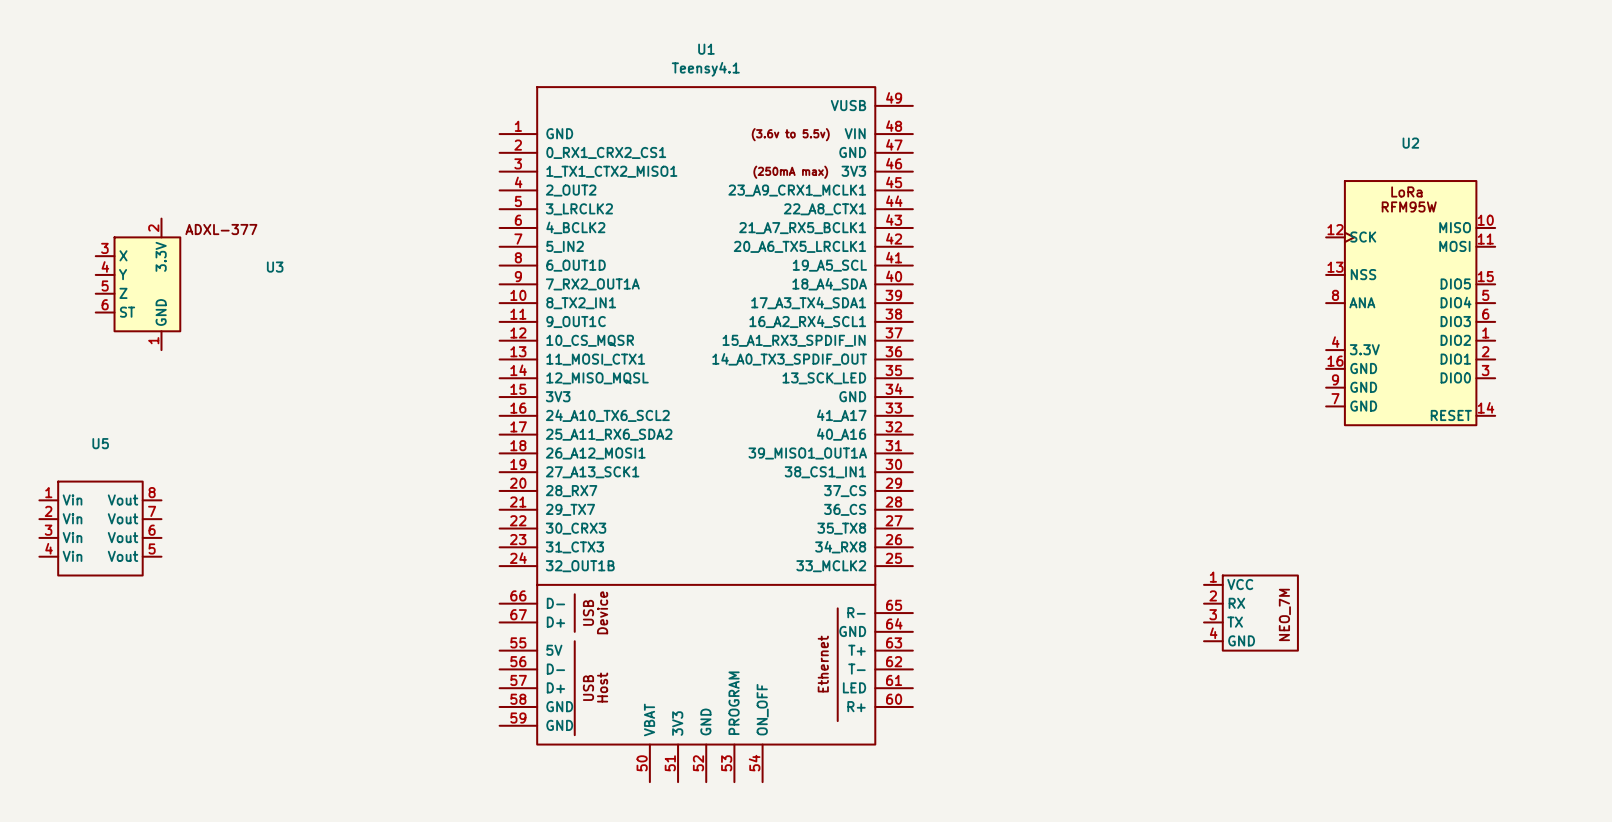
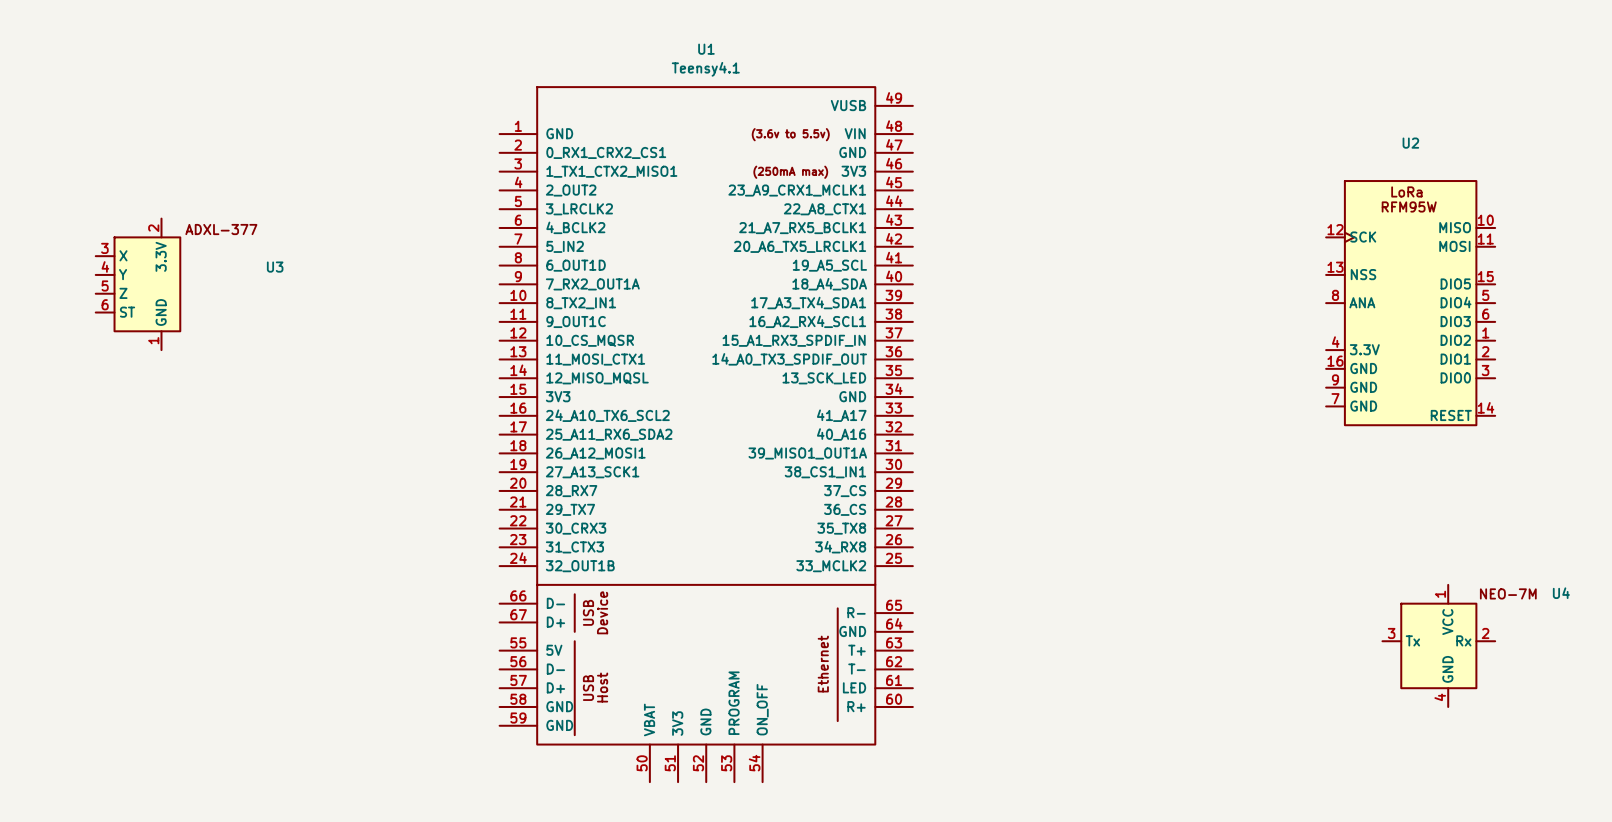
U5: (100, 528) -> none
part: (1250, 613) -> none
U4: none -> (1438, 645)

